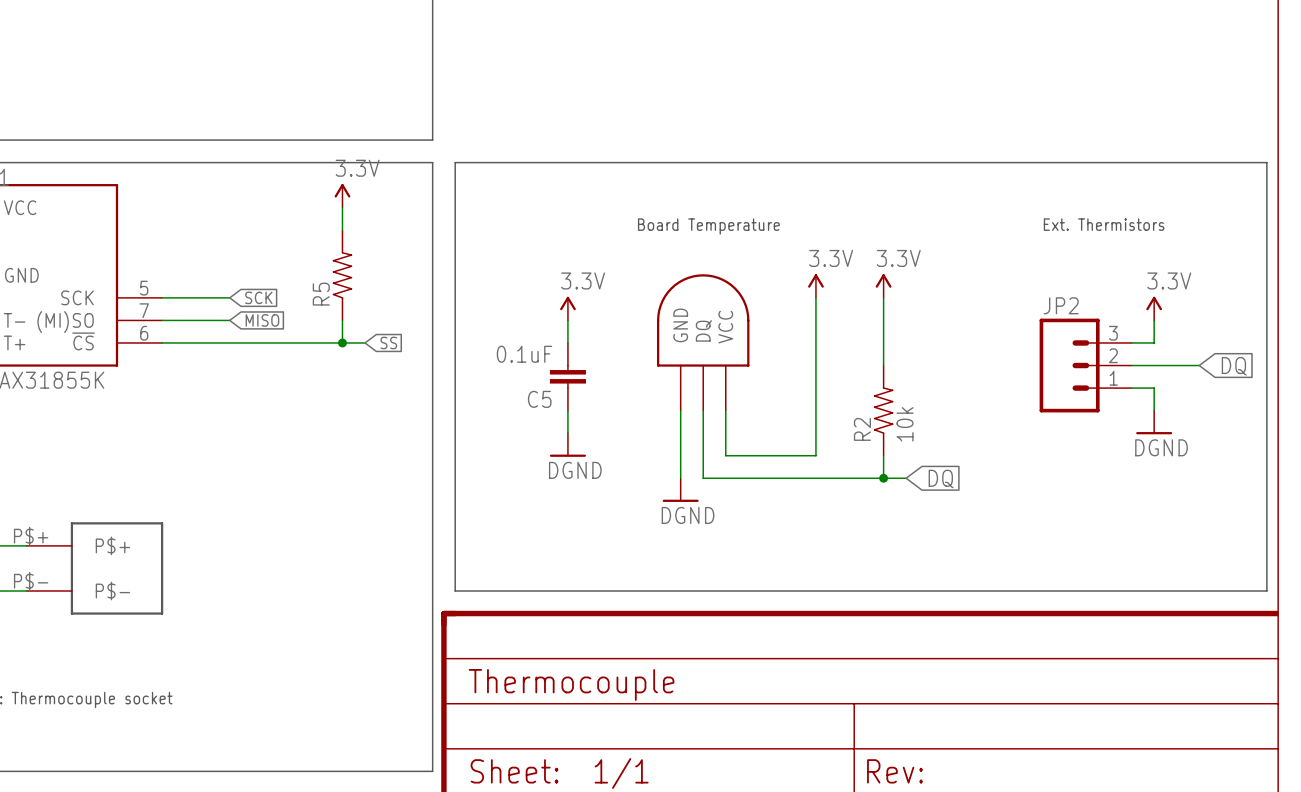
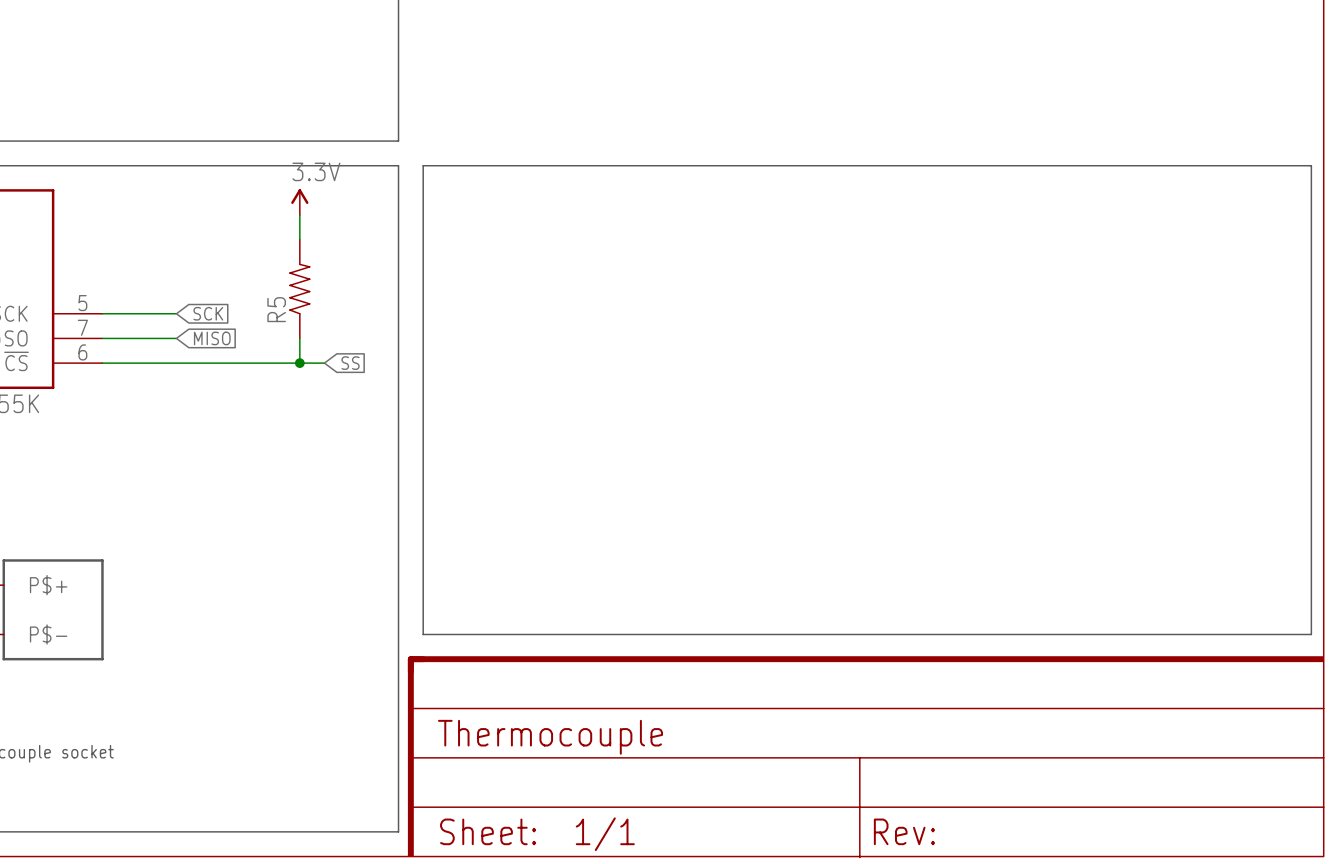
text: Ext. Thermistors (1104, 224) -> none
text: Board Temperature (708, 226) -> none
power symbol: 3.3V (815, 286) -> none
power symbol: 3.3V (883, 286) -> none
wire: (815, 297) (815, 455) (725, 455) (725, 410) -> none
wire: (883, 297) (883, 365) -> none
power symbol: 3.3V (567, 308) -> none
power symbol: 3.3V (1154, 308) -> none
wire: (567, 320) (567, 342) -> none
wire: (1154, 320) (1154, 342) (1131, 342) -> none
part: (703, 342) -> none
JP2: (1085, 365) -> none
wire: (1131, 365) (1199, 365) -> none
global label: DQ (1234, 366) -> none
C5: 0.1uF (567, 376) -> none
wire: (1131, 388) (1154, 388) (1154, 410) -> none
wire: (567, 410) (567, 433) -> none
wire: (680, 410) (680, 478) -> none
wire: (703, 410) (703, 478) (906, 478) -> none
R2: 10k (883, 410) -> none
power symbol: DGND (1154, 422) -> none
power symbol: DGND (567, 445) -> none
wire: (883, 455) (883, 478) -> none
junction: (883, 478) -> none
global label: DQ (941, 479) -> none
power symbol: DGND (680, 490) -> none

